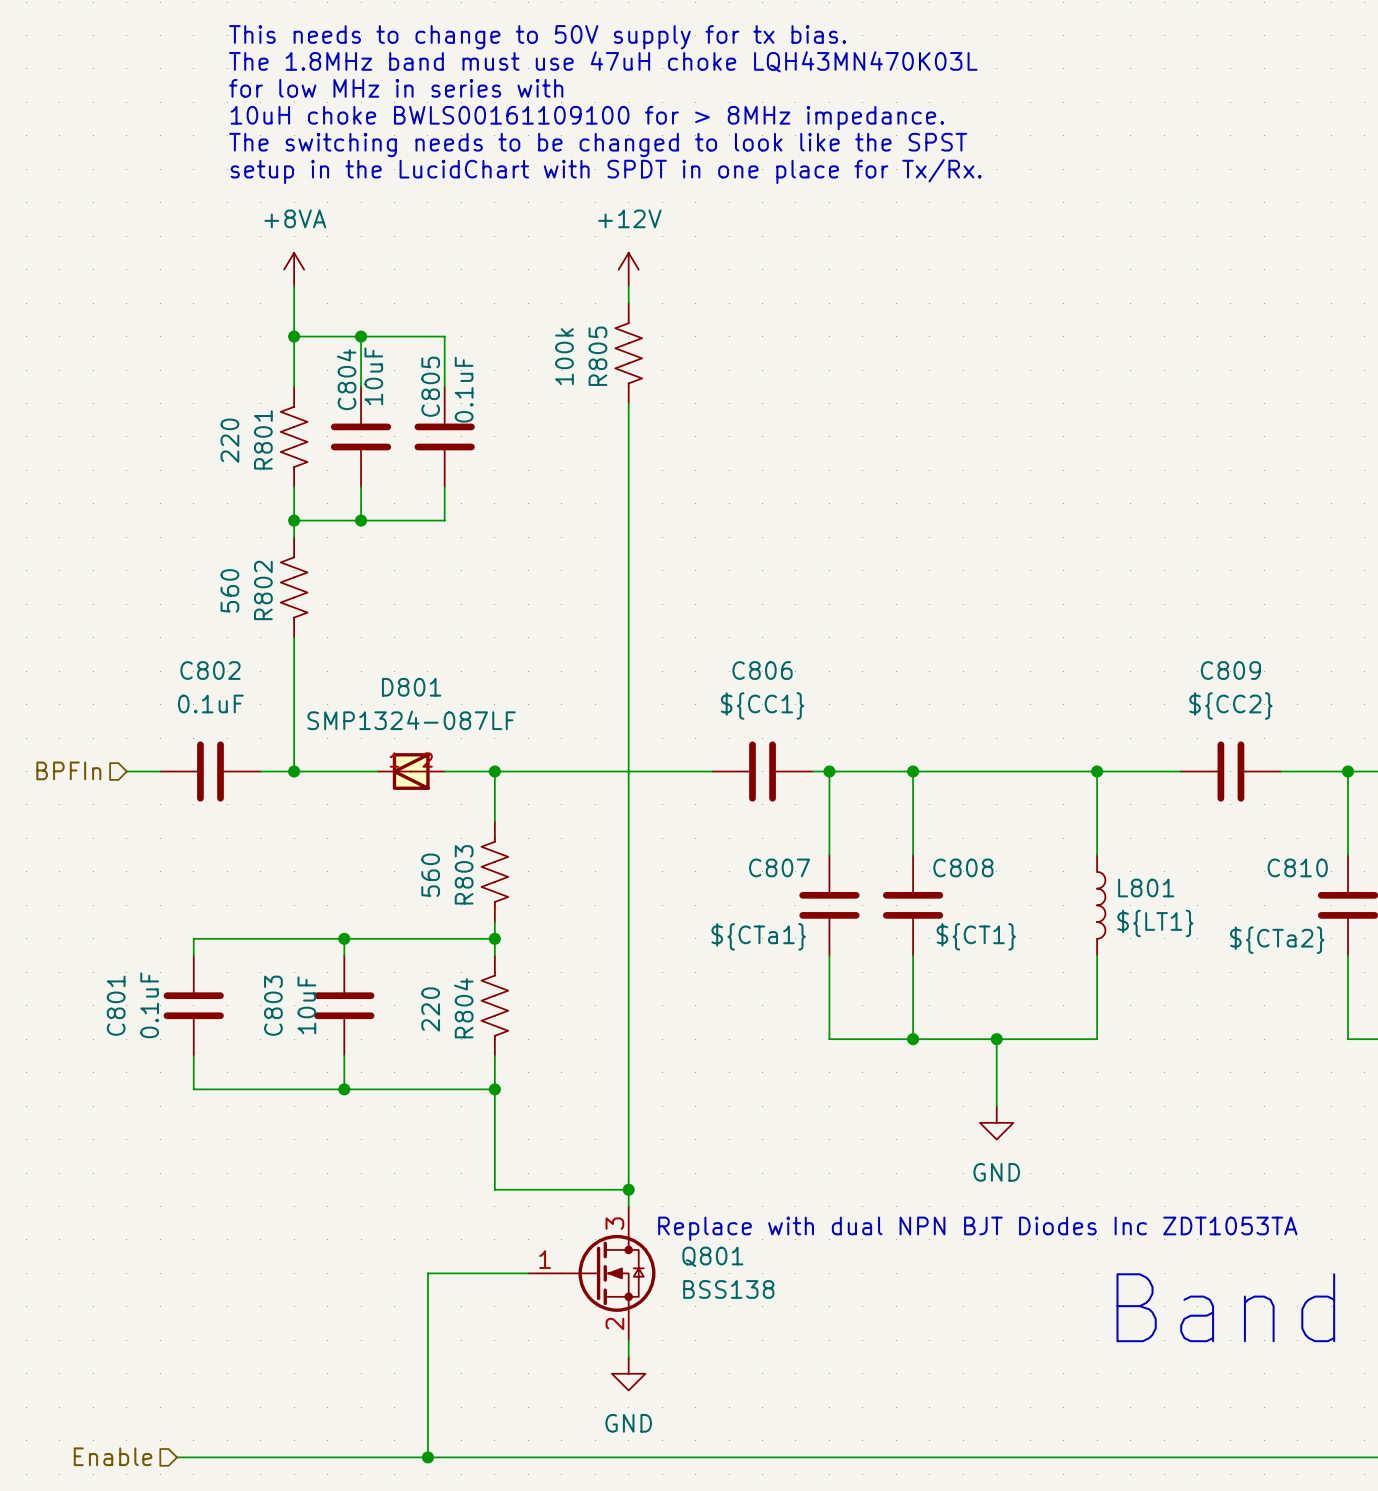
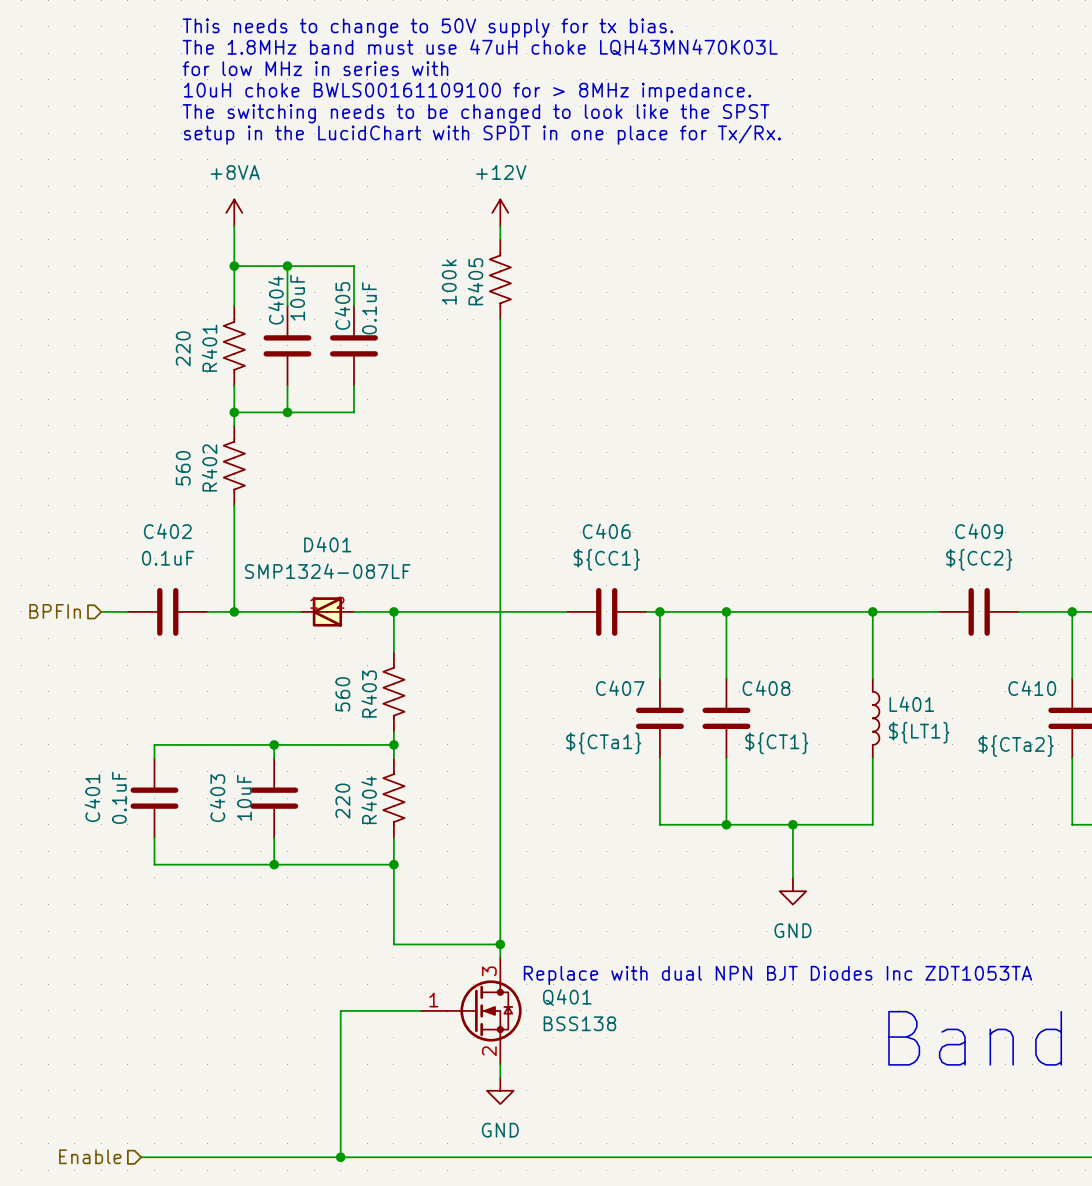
R805 name: R805 (597, 356) -> R405 (475, 281)
C804 name: C804 (346, 379) -> C404 (276, 300)
C805 name: C805 (430, 386) -> C405 (342, 305)
R801 name: R801 (263, 439) -> R401 (209, 348)
R802 name: R802 (263, 590) -> R402 (209, 467)
C802 name: C802 (210, 670) -> C402 (167, 531)
C806 name: C806 (762, 670) -> C406 (606, 531)
C809 name: C809 (1230, 670) -> C409 (979, 531)
D801 name: D801 (411, 687) -> D401 (327, 544)
C807 name: C807 (779, 867) -> C407 (620, 688)
C808 name: C808 (963, 867) -> C408 (766, 688)
C810 name: C810 (1297, 867) -> C410 (1032, 688)
R803 name: R803 (464, 874) -> R403 (369, 694)
L801 name: L801 (1146, 888) -> L401 (911, 704)
C801 name: C801 (116, 1005) -> C401 (92, 798)
C803 name: C803 (273, 1005) -> C403 (217, 798)
R804 name: R804 (463, 1008) -> R404 (369, 800)
Q801 name: Q801 (712, 1256) -> Q401 (567, 997)

